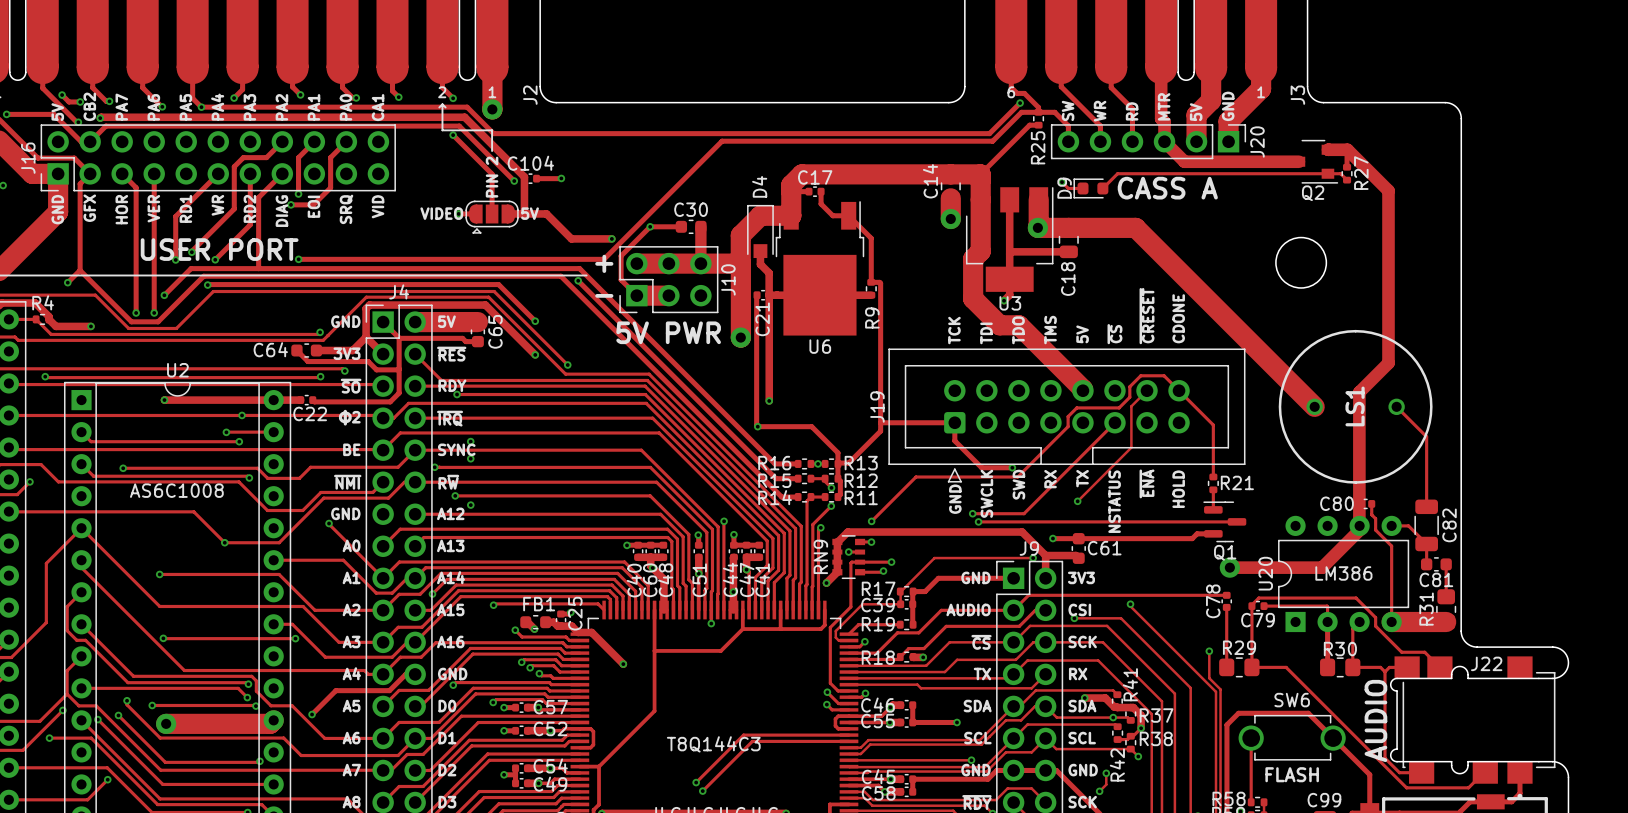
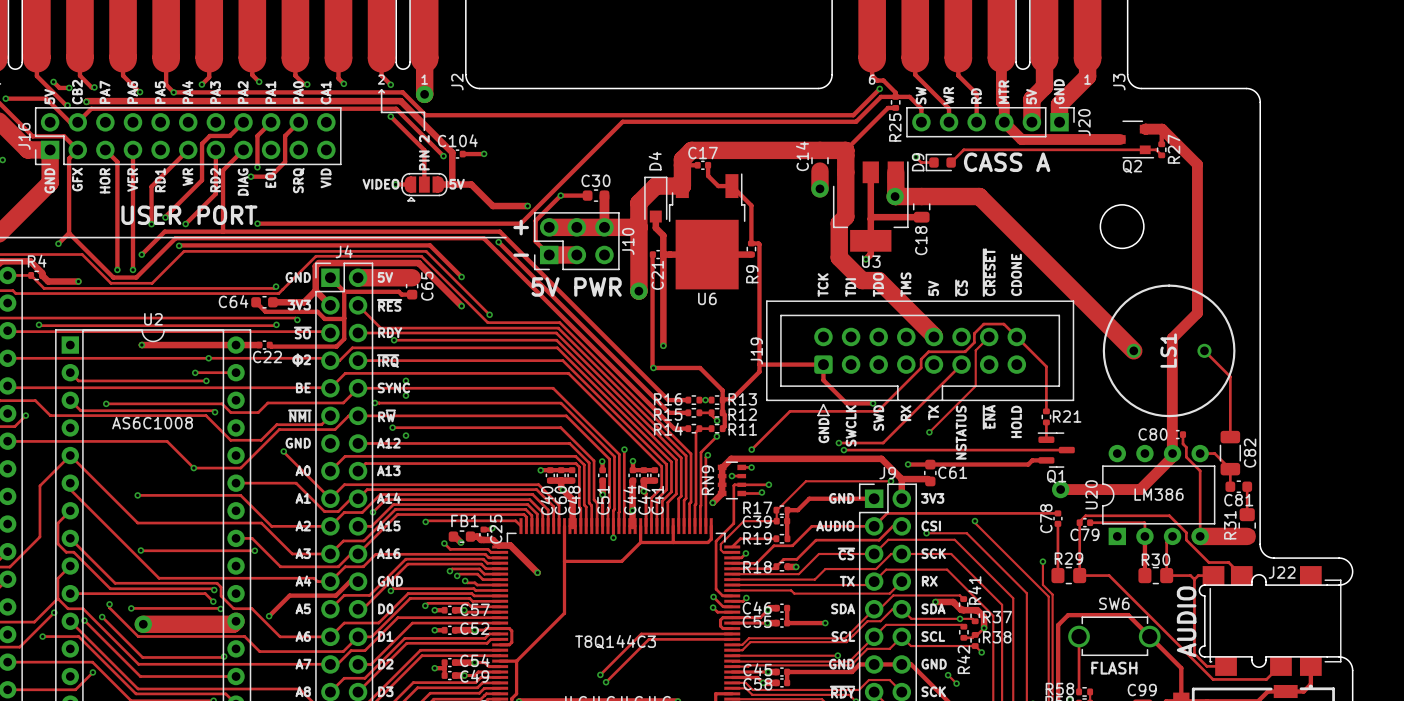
track: (1106, 773) (1106, 784) (1099, 791) -> none
via: (1106, 773) -> none
track: none -> (948, 675) (956, 683)
via: none -> (948, 675)
via: (1099, 791) -> none
via: none -> (956, 683)

